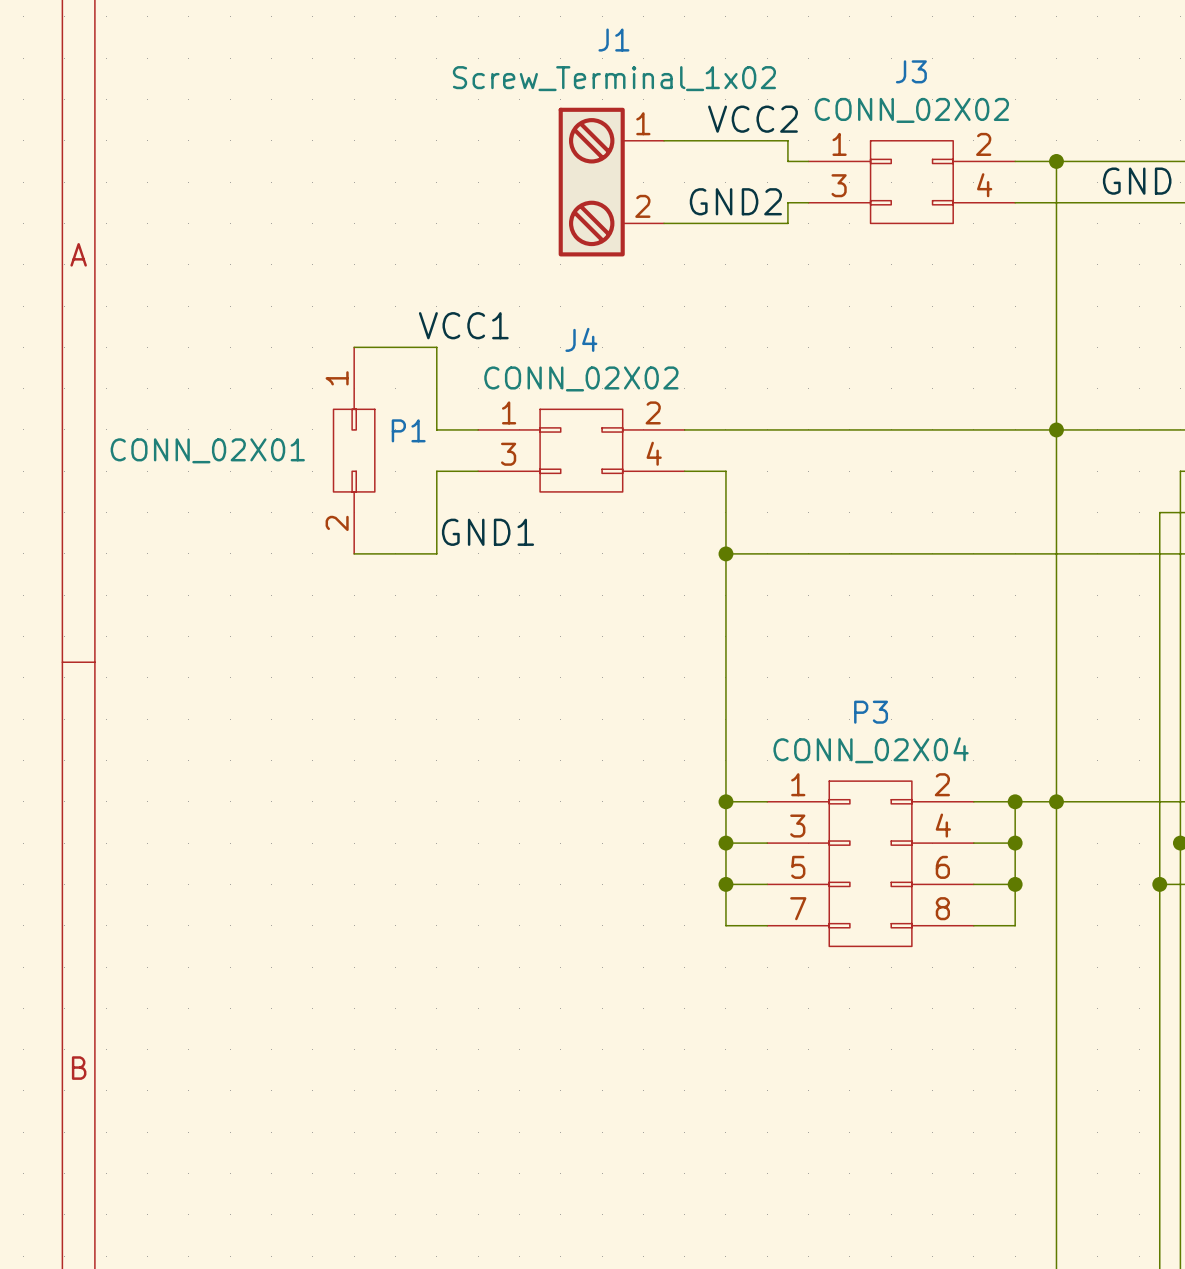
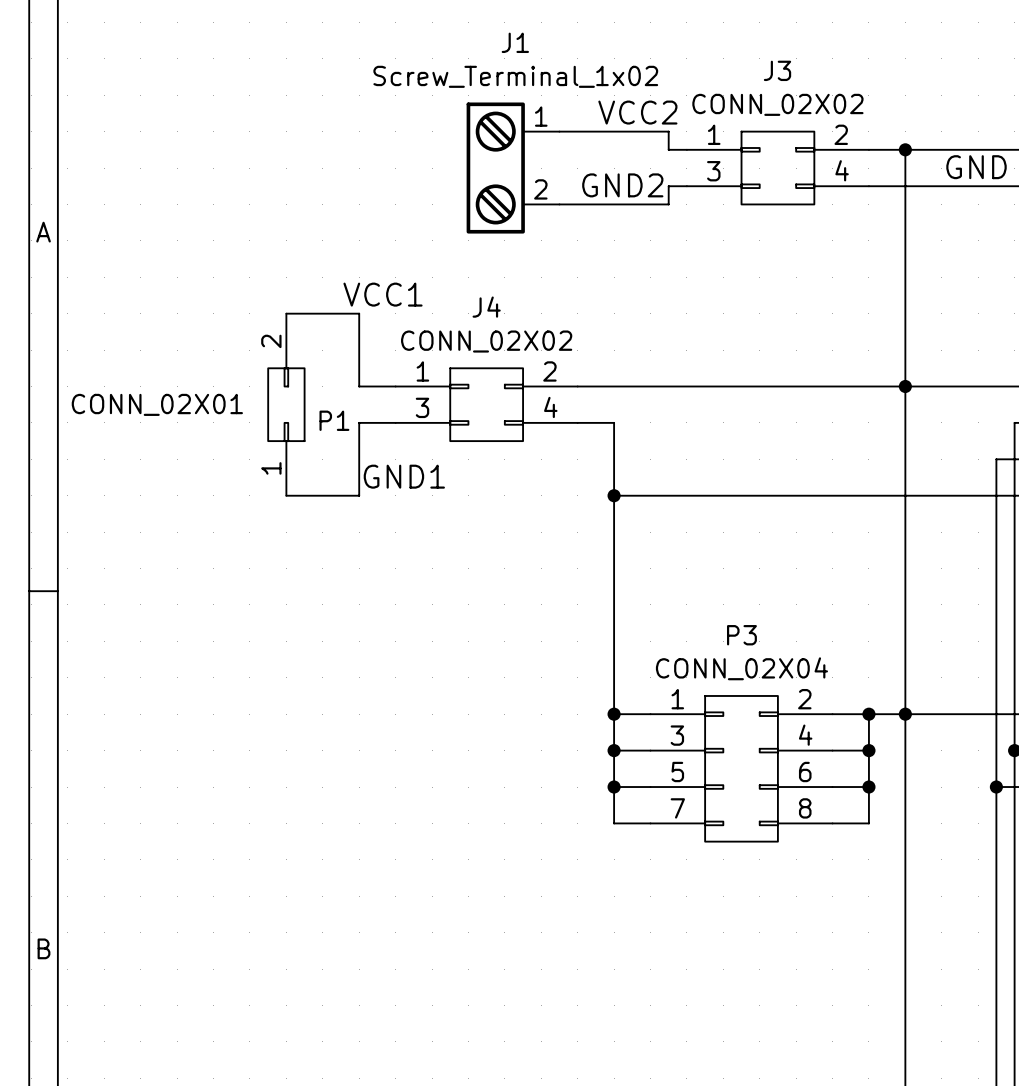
P1 name position: P1 (408, 430) -> P1 (334, 420)
P1 rotation: 0° (354, 450) -> 180° (286, 404)

